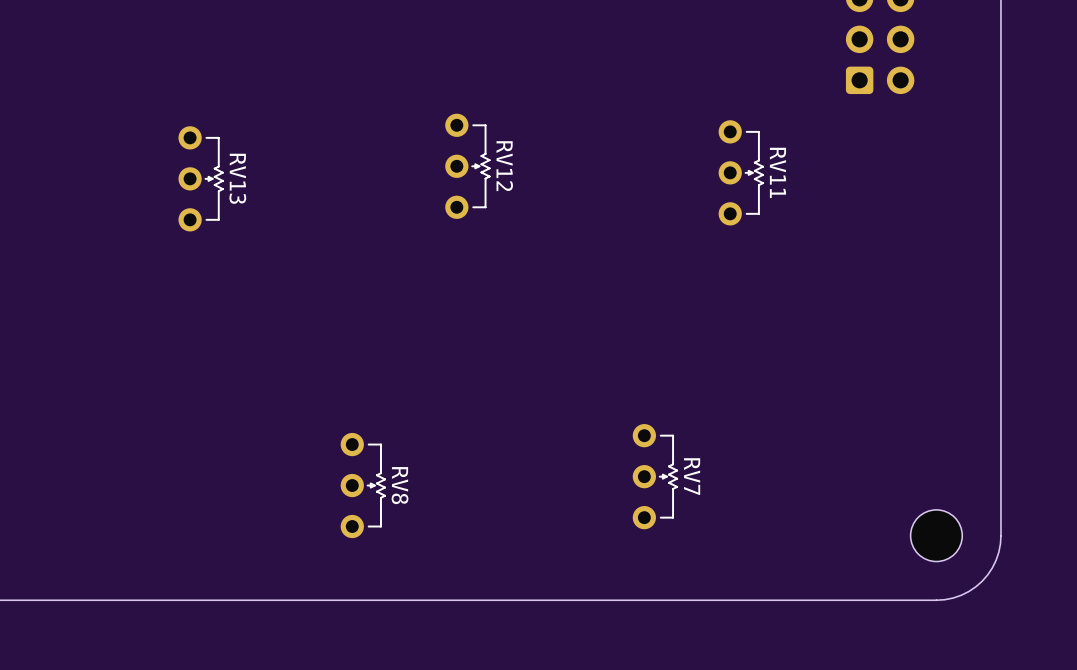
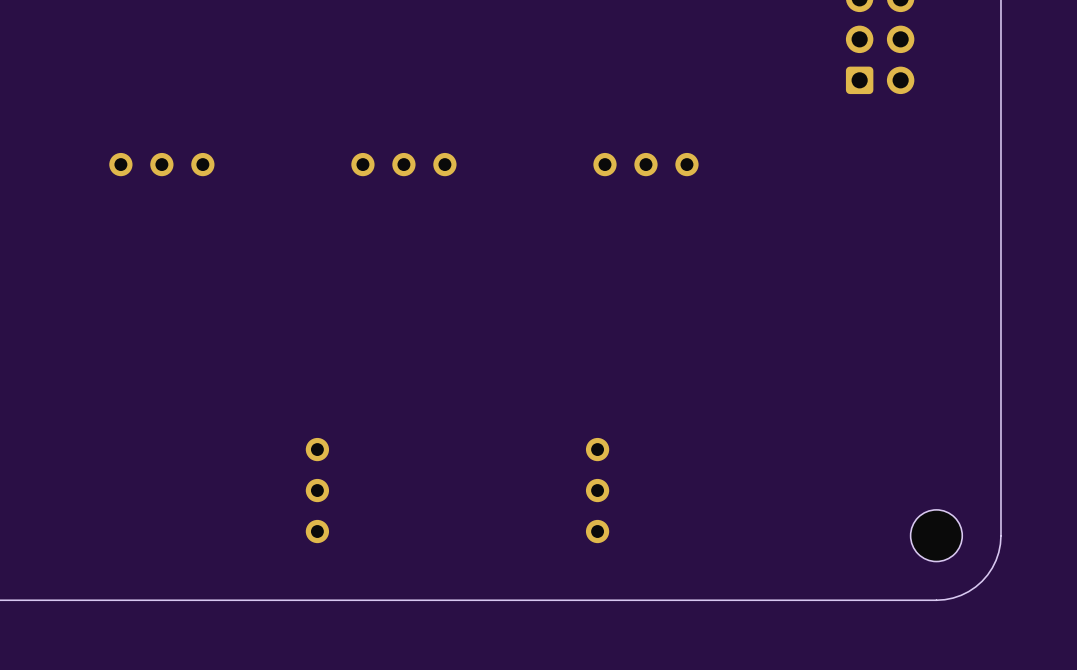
part: none -> (161, 164)
part: none -> (403, 164)
part: none -> (645, 164)
RV12: (467, 166) -> none
RV11: (741, 172) -> none
RV13: (201, 178) -> none
RV7: (655, 476) -> none
RV8: (363, 485) -> none
part: none -> (317, 490)
part: none -> (597, 490)

